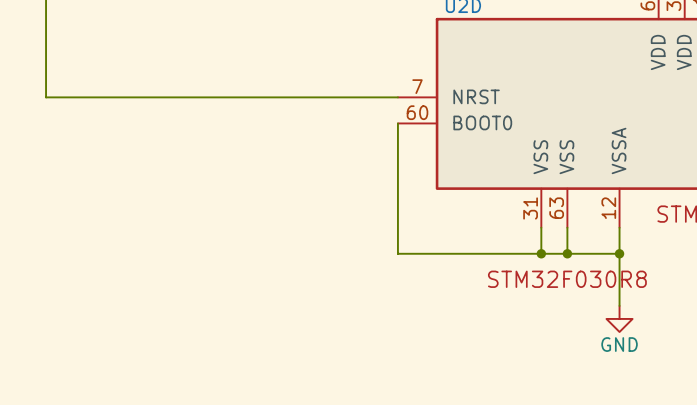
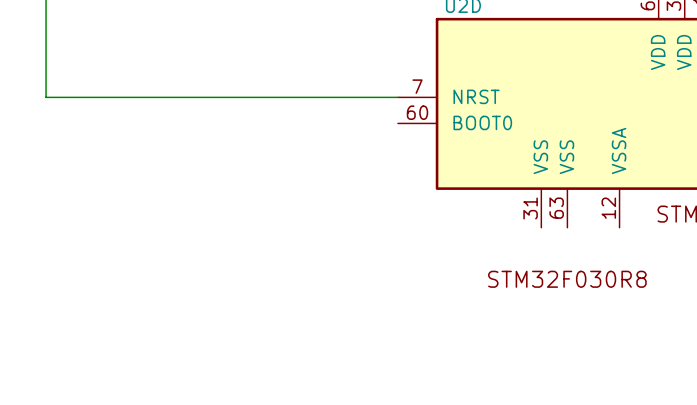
wire: (397, 123) (397, 253) (619, 253) -> none
wire: (541, 227) (541, 253) -> none
wire: (567, 227) (567, 253) -> none
wire: (619, 227) (619, 305) -> none
junction: (541, 253) -> none
junction: (567, 253) -> none
junction: (619, 253) -> none
power symbol: GND (619, 318) -> none

